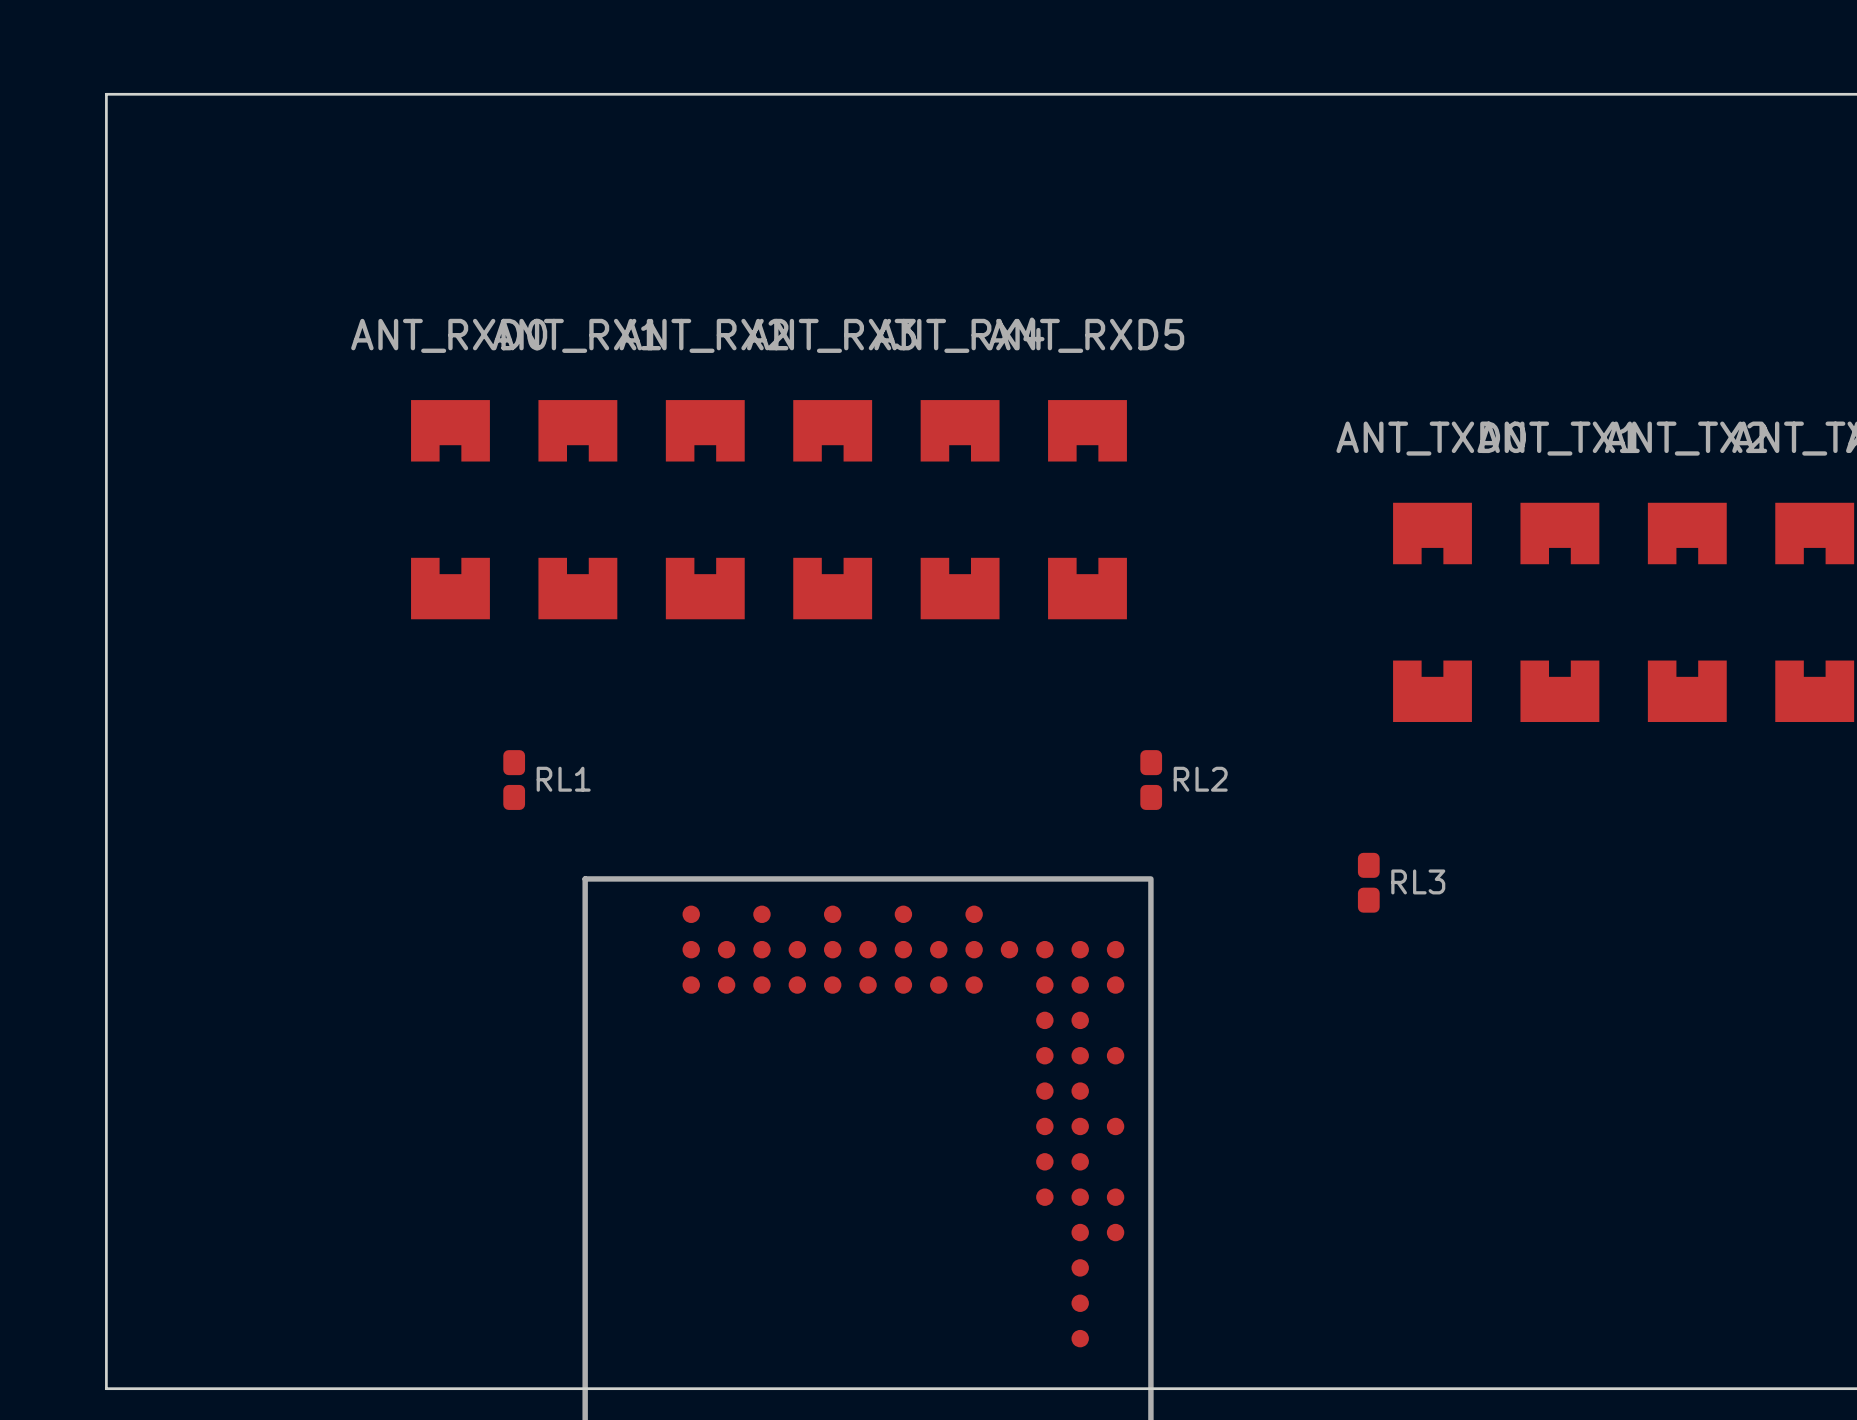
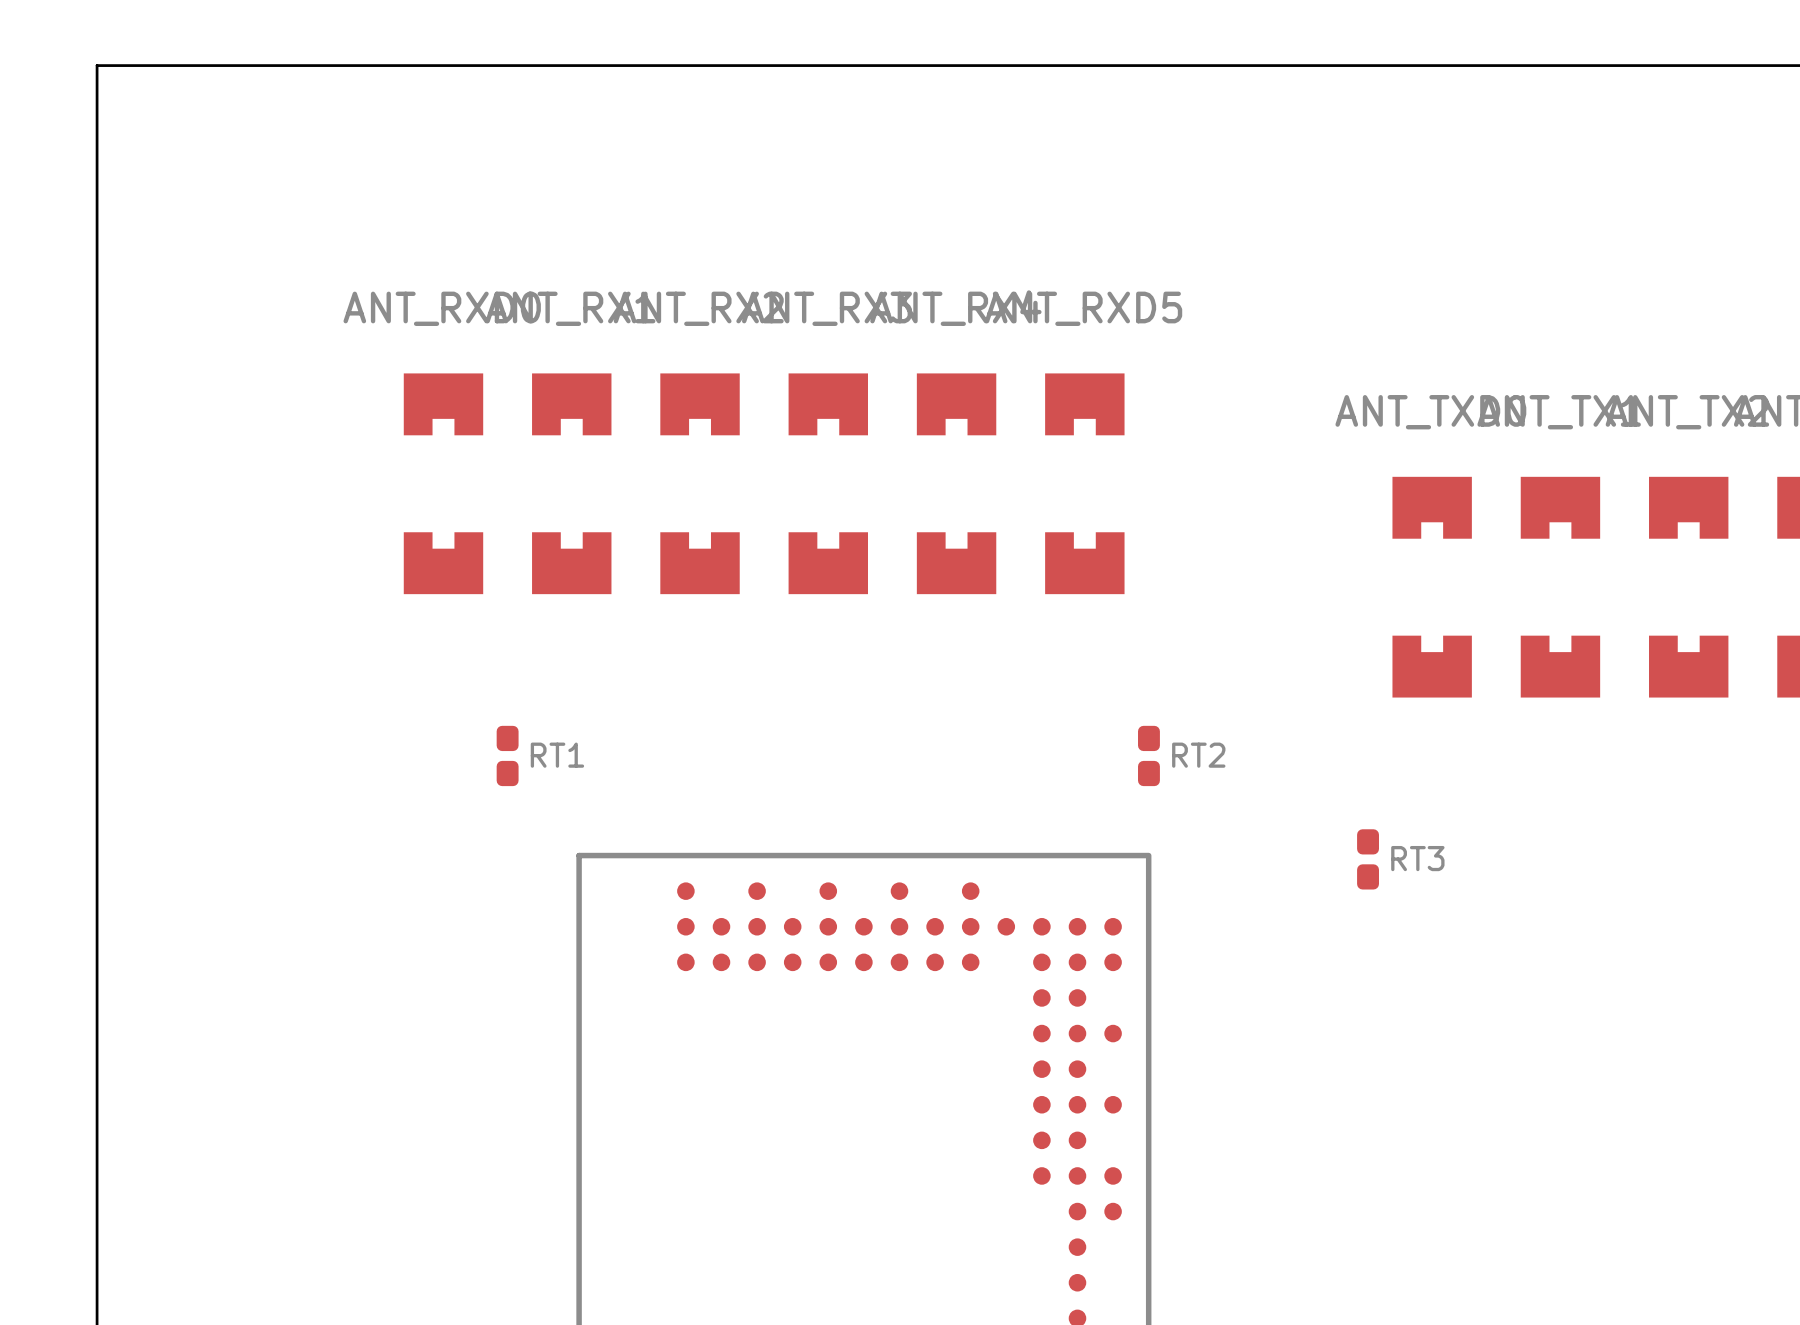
RL1 name: RL1 (563, 779) -> RT1 (557, 755)
RL2 name: RL2 (1200, 779) -> RT2 (1198, 755)
RL3 name: RL3 (1418, 881) -> RT3 (1417, 858)

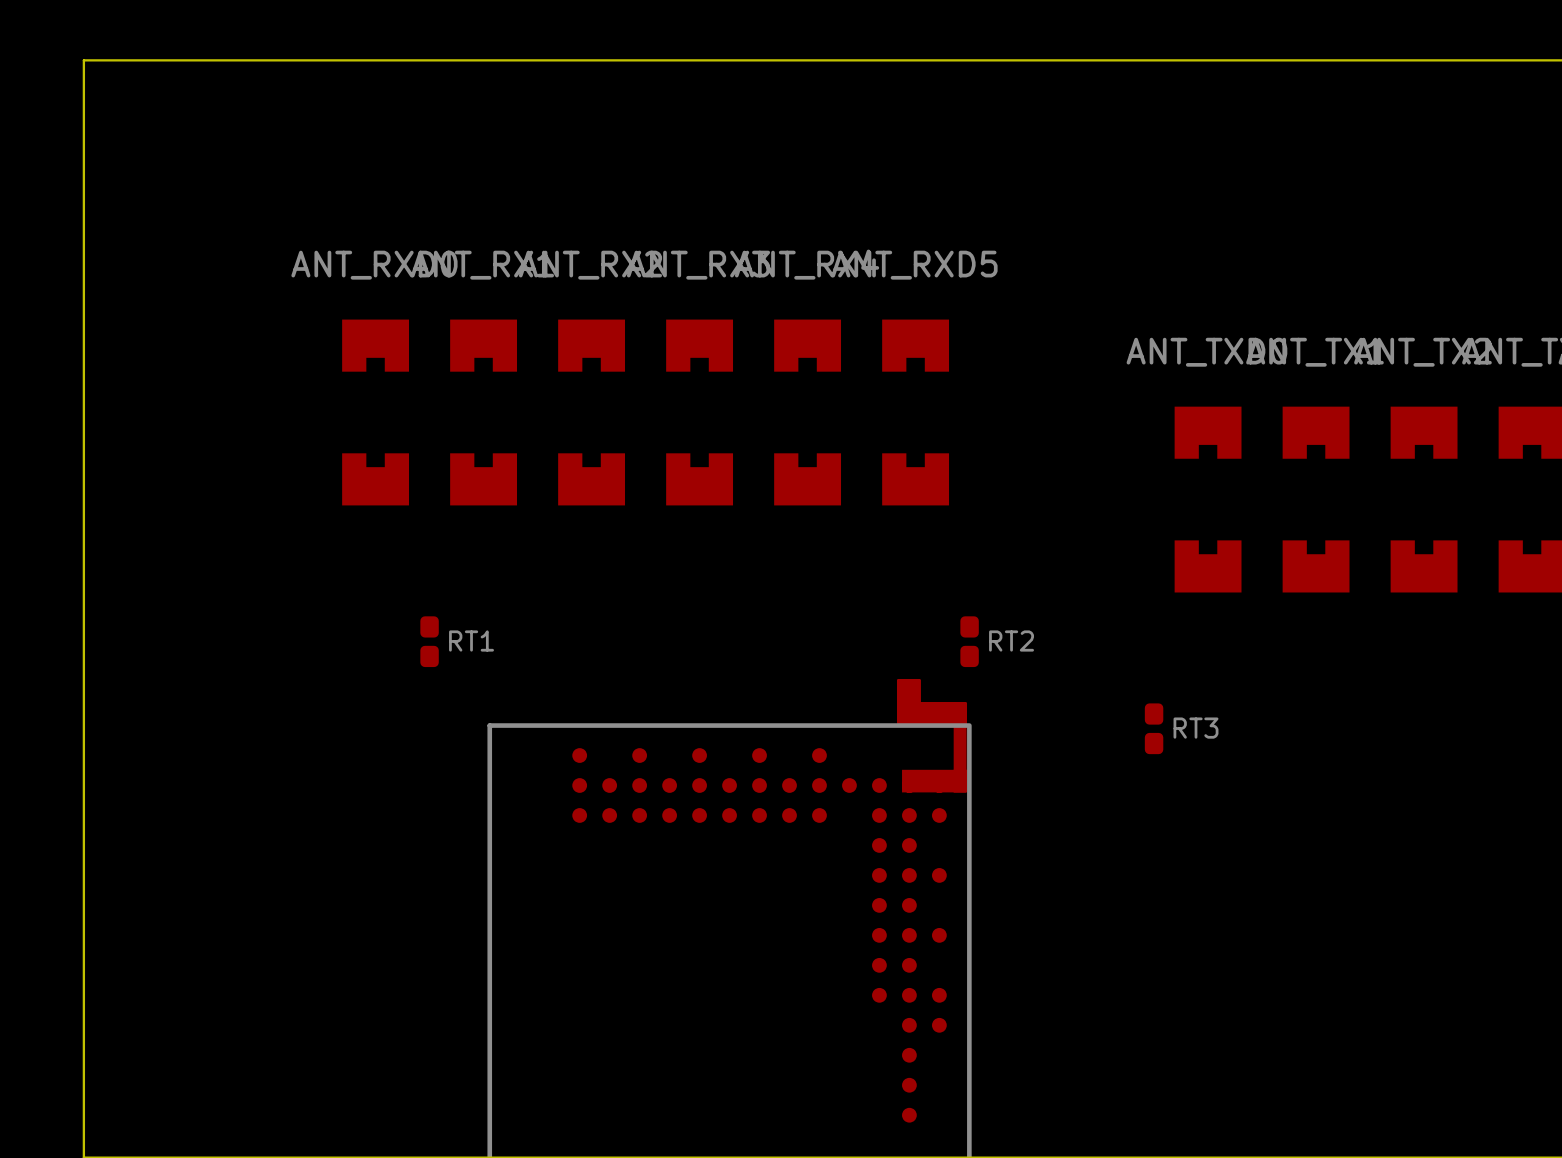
part: none -> (932, 735)

